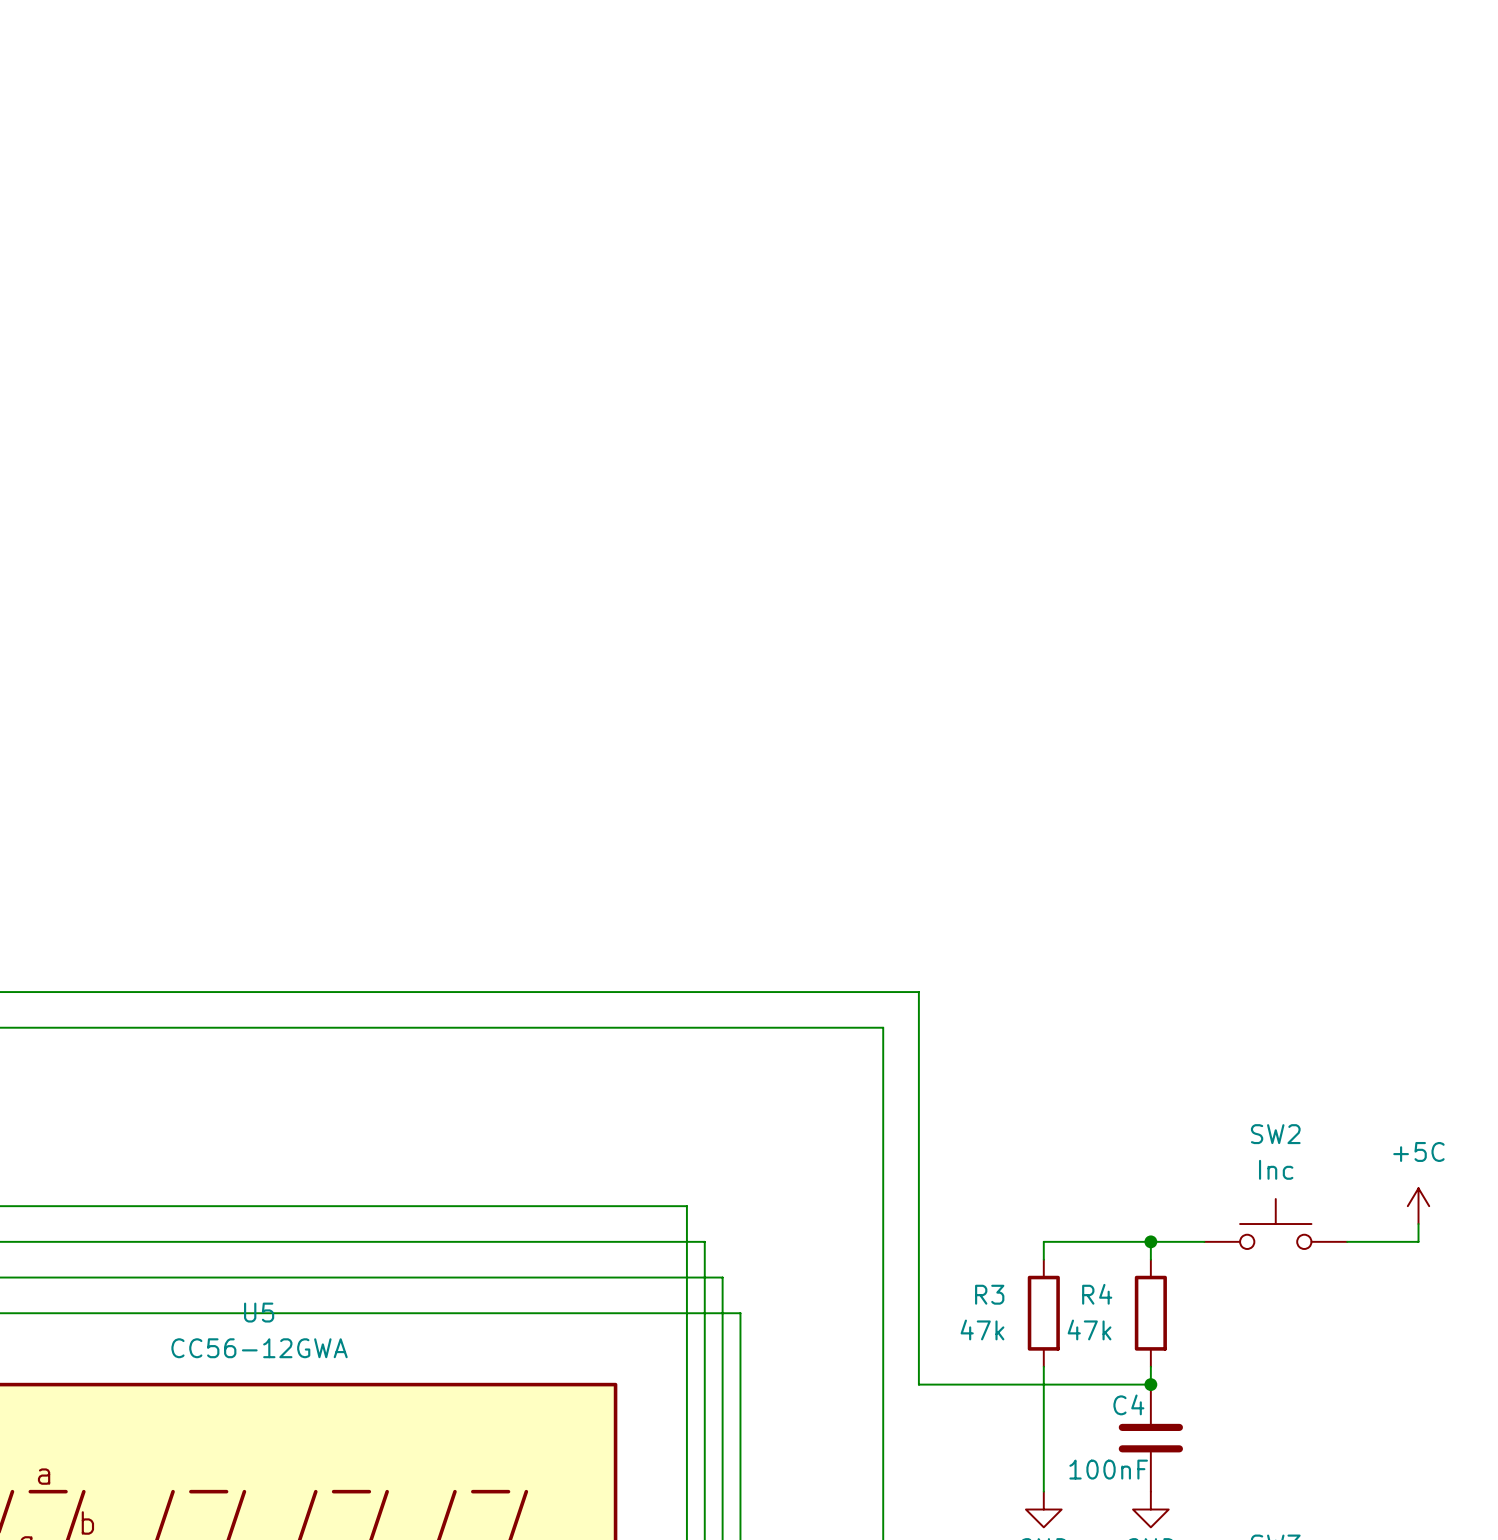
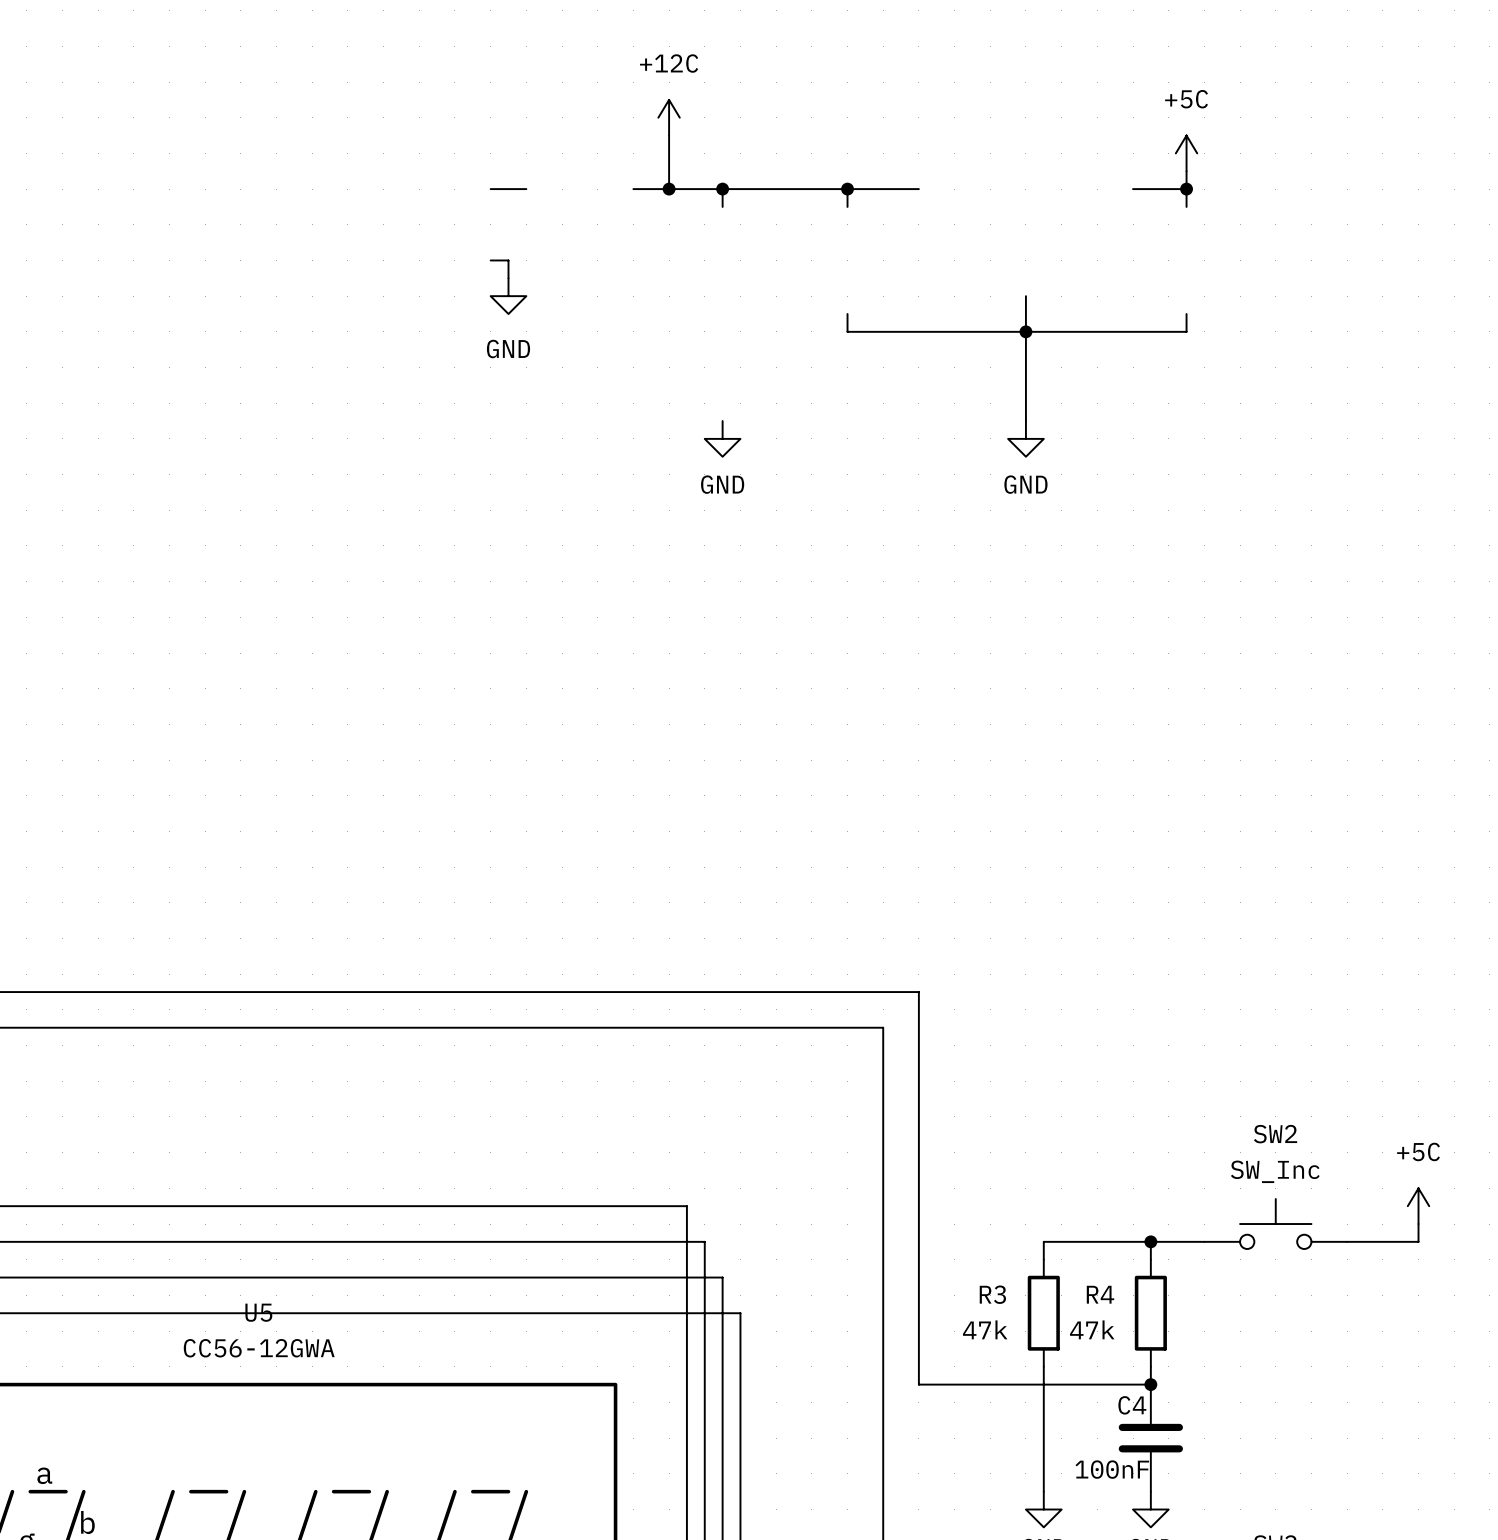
power symbol: none -> +12C (669, 117)
wire: none -> (669, 135) (669, 189)
power symbol: none -> +5C (1186, 153)
wire: none -> (1186, 171) (1186, 206)
wire: none -> (490, 189) (526, 189)
wire: none -> (633, 189) (918, 189)
junction: none -> (669, 189)
wire: none -> (722, 189) (722, 206)
junction: none -> (722, 189)
wire: none -> (847, 189) (847, 206)
junction: none -> (847, 189)
wire: none -> (1133, 189) (1186, 189)
junction: none -> (1186, 189)
wire: none -> (490, 260) (508, 260) (508, 278)
power symbol: none -> GND (508, 296)
wire: none -> (1025, 296) (1025, 421)
wire: none -> (847, 313) (847, 331) (1186, 331) (1186, 313)
junction: none -> (1025, 331)
power symbol: none -> GND (722, 438)
power symbol: none -> GND (1025, 438)
SW2 value: Inc (1276, 1169) -> SW_Inc (1275, 1171)

